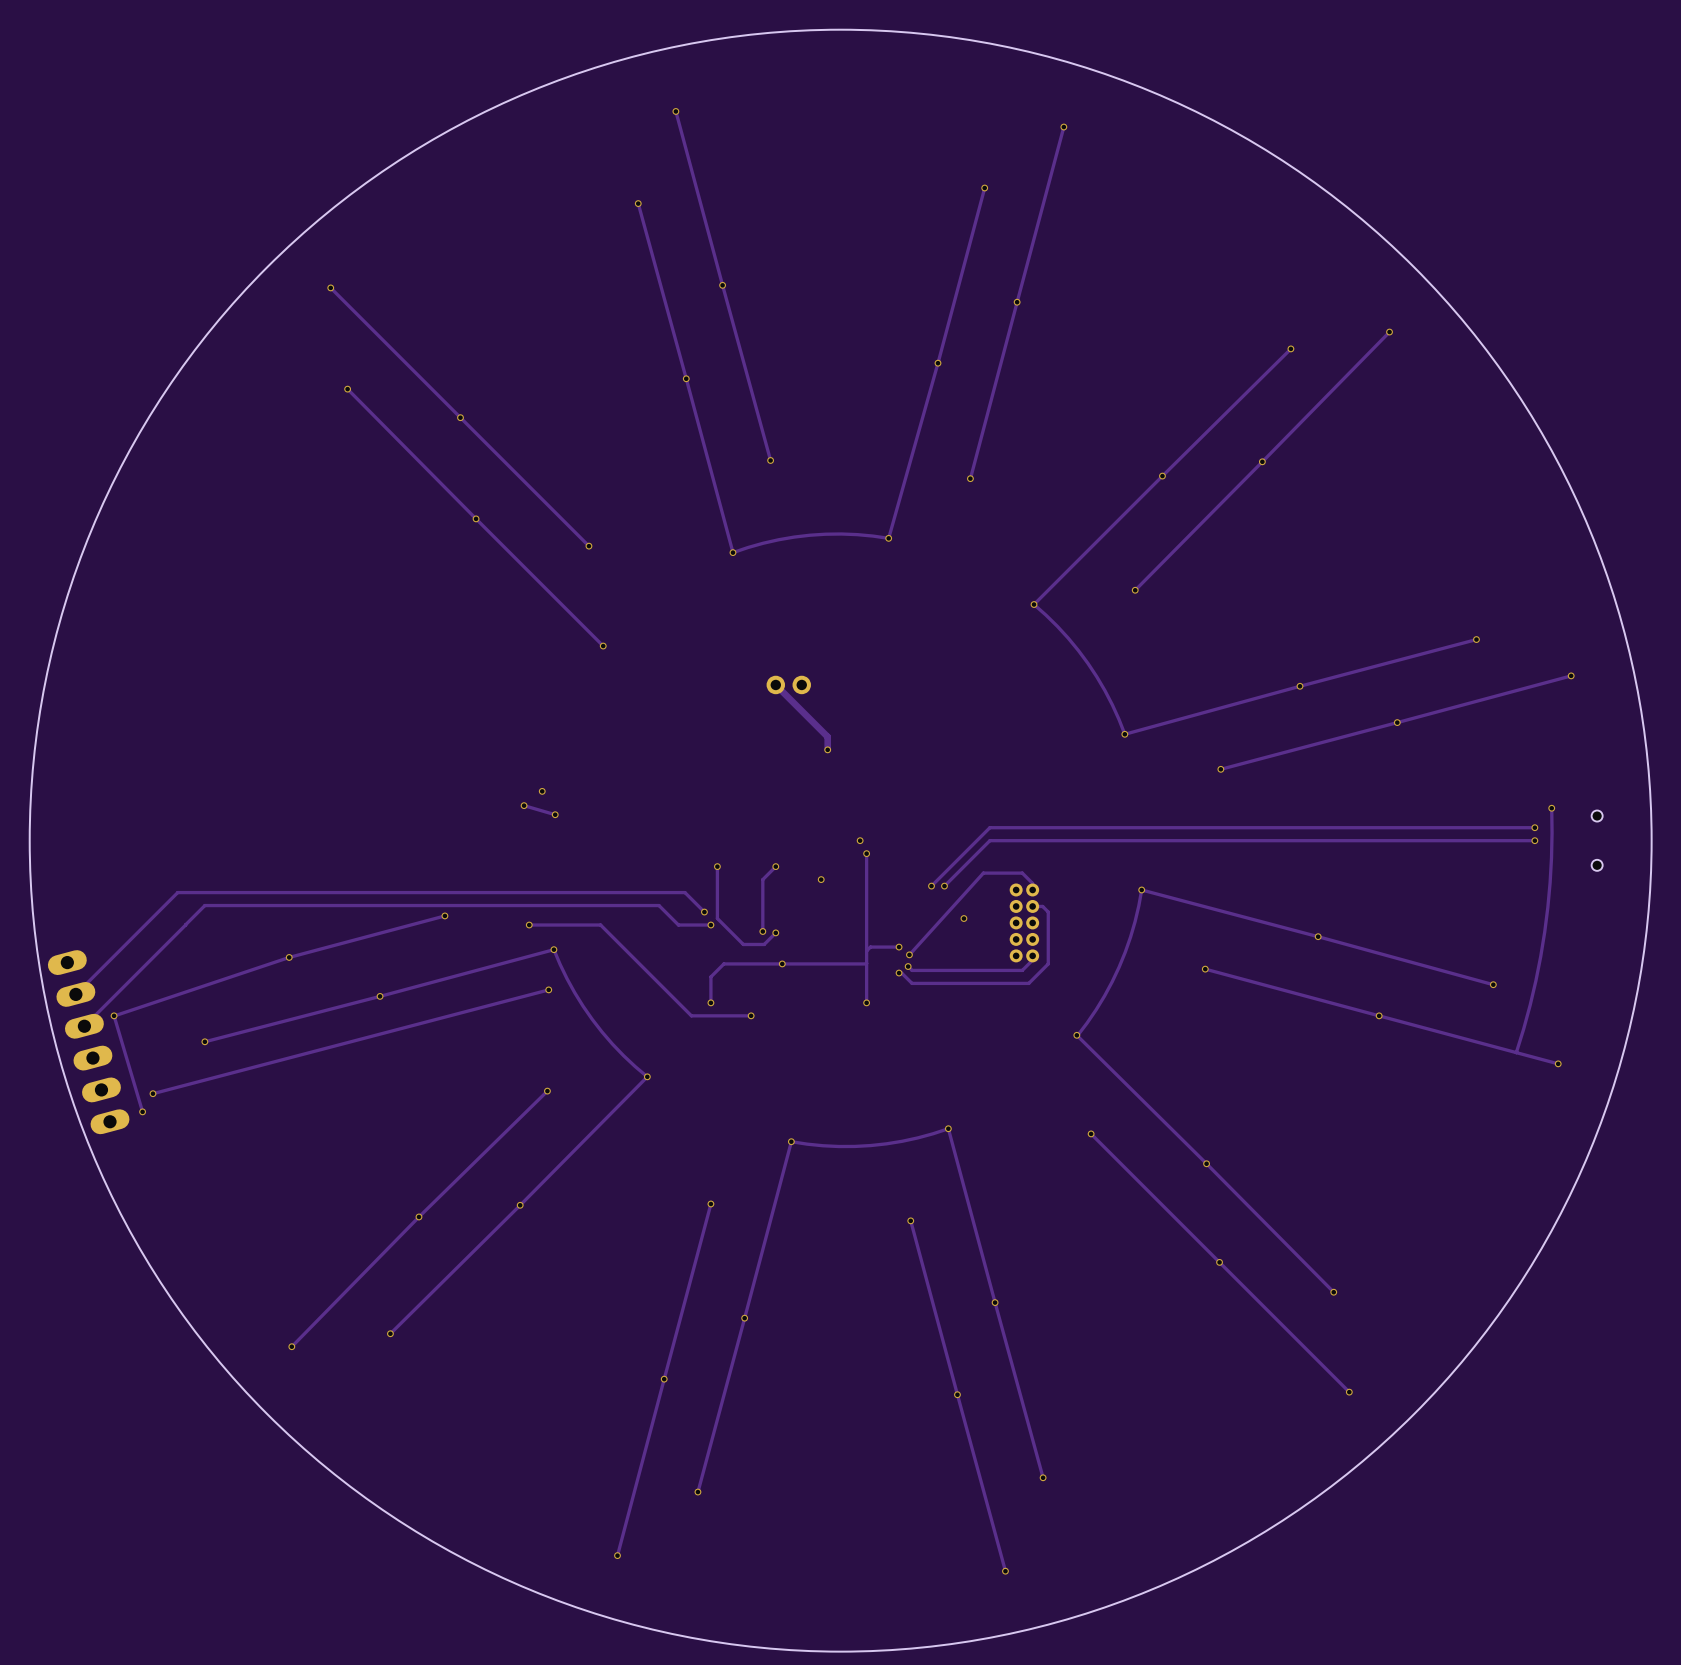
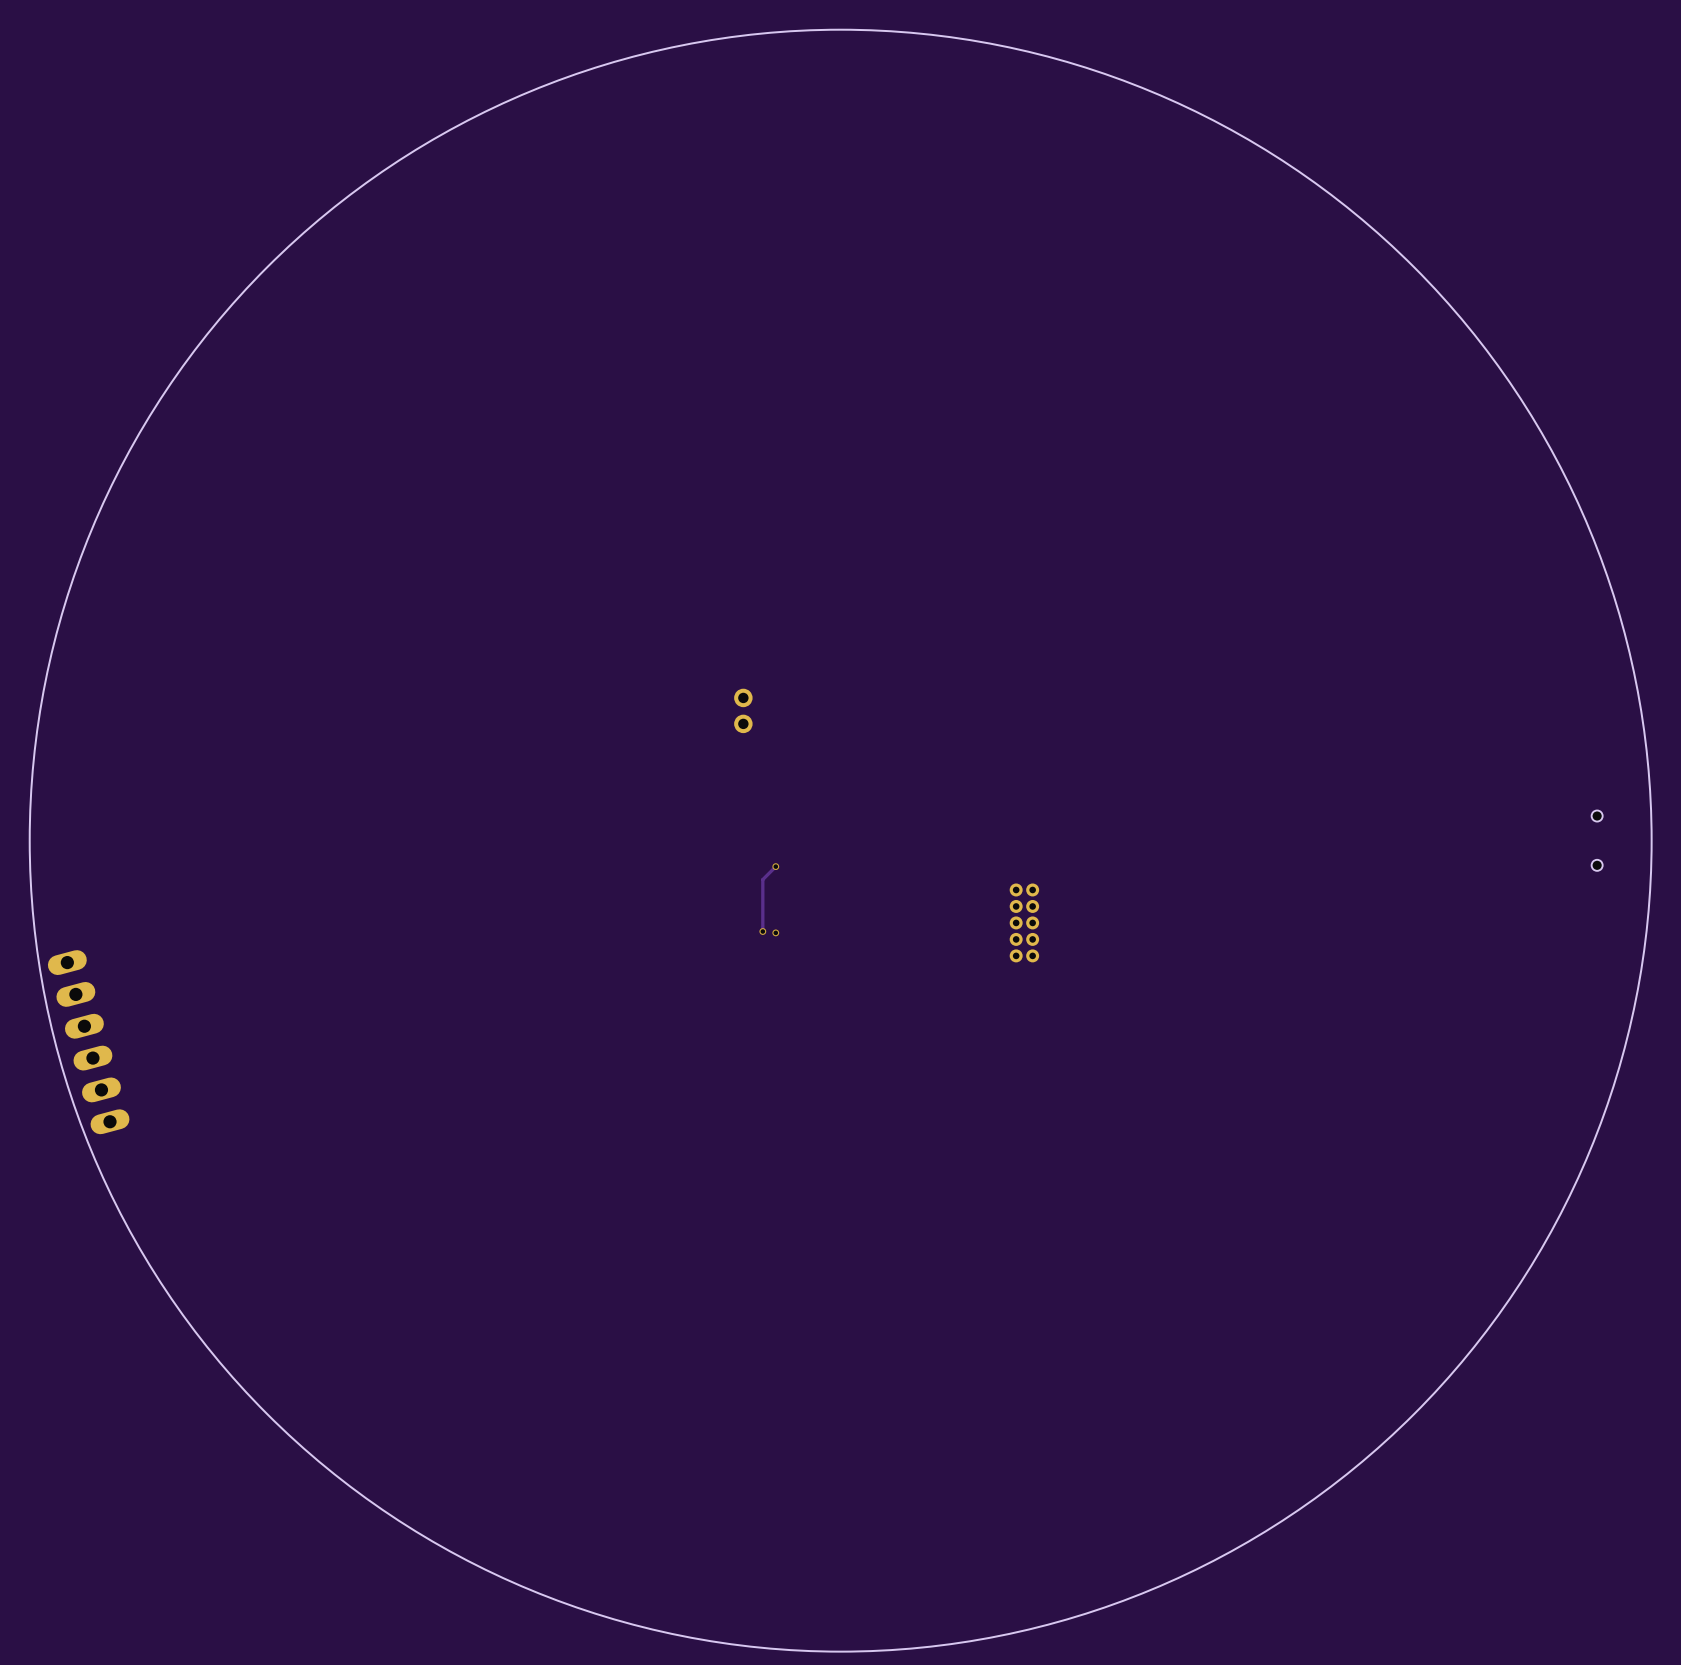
track: (675, 111) (770, 460) -> none
via: (675, 111) -> none
track: (1063, 127) (970, 478) -> none
via: (1063, 127) -> none
track: (984, 188) (888, 538) (841, 534) (809, 535) (778, 539) (732, 552) (638, 203) -> none
via: (984, 188) -> none
via: (638, 203) -> none
via: (722, 285) -> none
track: (330, 287) (588, 546) -> none
via: (330, 287) -> none
via: (1017, 302) -> none
track: (1389, 332) (1135, 590) -> none
via: (1389, 332) -> none
track: (1290, 348) (1034, 604) (1057, 626) (1087, 663) (1104, 690) (1124, 734) (1476, 639) -> none
via: (1290, 348) -> none
via: (937, 363) -> none
via: (686, 378) -> none
track: (347, 389) (603, 646) -> none
via: (347, 389) -> none
via: (460, 417) -> none
via: (770, 460) -> none
via: (1262, 461) -> none
via: (1162, 476) -> none
via: (970, 478) -> none
via: (476, 518) -> none
via: (888, 538) -> none
via: (588, 546) -> none
via: (732, 552) -> none
via: (1135, 590) -> none
via: (1034, 604) -> none
via: (1476, 639) -> none
via: (603, 646) -> none
track: (1571, 675) (1220, 769) -> none
via: (1571, 675) -> none
track: (775, 684) (827, 736) (827, 749) -> none
part rotation: 0° (788, 684) -> 90° clockwise (743, 710)
part position: (788, 684) -> (743, 710)
via: (1300, 686) -> none
via: (1397, 722) -> none
via: (1124, 734) -> none
via: (827, 749) -> none
via: (1220, 769) -> none
via: (542, 791) -> none
track: (524, 805) (555, 814) -> none
via: (524, 805) -> none
track: (1551, 808) (1551, 857) (1544, 931) (1535, 980) (1516, 1052) -> none
via: (1551, 808) -> none
via: (555, 814) -> none
track: (1534, 827) (989, 827) (931, 886) -> none
via: (1534, 827) -> none
via: (860, 840) -> none
track: (1534, 840) (989, 840) (944, 886) -> none
via: (1534, 840) -> none
track: (866, 853) (866, 1002) -> none
via: (866, 853) -> none
track: (717, 866) (717, 918) (743, 944) (764, 944) (775, 932) -> none
via: (717, 866) -> none
via: (821, 879) -> none
via: (931, 886) -> none
via: (944, 886) -> none
track: (1032, 889) (1032, 883) (1022, 873) (983, 873) (909, 954) -> none
via: (1141, 889) -> none
track: (1032, 906) (1042, 906) (1048, 912) (1048, 963) (1028, 983) (912, 983) (901, 973) (899, 973) -> none
track: (704, 912) (684, 892) (177, 892) (75, 994) -> none
via: (704, 912) -> none
track: (444, 915) (289, 957) (114, 1016) (142, 1111) -> none
via: (444, 915) -> none
via: (963, 918) -> none
track: (185, 924) (204, 905) (659, 905) (678, 925) (710, 925) -> none
track: (185, 925) (84, 1026) -> none
track: (529, 925) (600, 925) (691, 1015) (751, 1015) -> none
via: (529, 925) -> none
via: (710, 925) -> none
via: (1318, 936) -> none
track: (899, 947) (870, 947) (866, 950) -> none
via: (899, 947) -> none
via: (553, 949) -> none
via: (909, 954) -> none
track: (1032, 955) (1032, 960) (1022, 970) (912, 970) (908, 966) -> none
via: (289, 957) -> none
via: (782, 963) -> none
track: (866, 963) (723, 963) (710, 976) (710, 1002) -> none
via: (908, 966) -> none
track: (1205, 969) (1558, 1063) -> none
via: (1205, 969) -> none
via: (899, 973) -> none
track: (1493, 984) (1141, 889) (1130, 937) (1119, 967) (1104, 995) (1077, 1035) -> none
via: (1493, 984) -> none
track: (548, 989) (152, 1093) -> none
via: (548, 989) -> none
via: (380, 996) -> none
via: (710, 1002) -> none
via: (866, 1002) -> none
via: (114, 1015) -> none
via: (751, 1015) -> none
via: (1379, 1015) -> none
track: (1076, 1035) (1333, 1292) -> none
via: (1076, 1035) -> none
track: (204, 1041) (553, 949) (574, 992) (592, 1019) (612, 1044) (647, 1076) (390, 1333) -> none
via: (204, 1041) -> none
via: (1558, 1063) -> none
via: (647, 1076) -> none
track: (547, 1091) (418, 1216) (291, 1346) -> none
via: (547, 1091) -> none
via: (152, 1093) -> none
via: (142, 1111) -> none
via: (948, 1128) -> none
track: (1091, 1133) (1349, 1392) -> none
via: (1091, 1133) -> none
via: (791, 1141) -> none
via: (1206, 1163) -> none
track: (710, 1203) (617, 1555) -> none
via: (710, 1203) -> none
via: (520, 1205) -> none
via: (418, 1216) -> none
track: (910, 1220) (958, 1396) -> none
via: (910, 1220) -> none
via: (1219, 1262) -> none
via: (1333, 1292) -> none
via: (995, 1302) -> none
via: (744, 1318) -> none
via: (390, 1333) -> none
via: (291, 1346) -> none
via: (664, 1379) -> none
via: (1349, 1392) -> none
track: (957, 1394) (1005, 1571) -> none
via: (957, 1394) -> none
track: (1043, 1477) (948, 1128) (917, 1137) (870, 1145) (838, 1146) (791, 1141) (697, 1492) -> none
via: (1043, 1477) -> none
via: (697, 1492) -> none
via: (617, 1555) -> none
via: (1005, 1571) -> none

